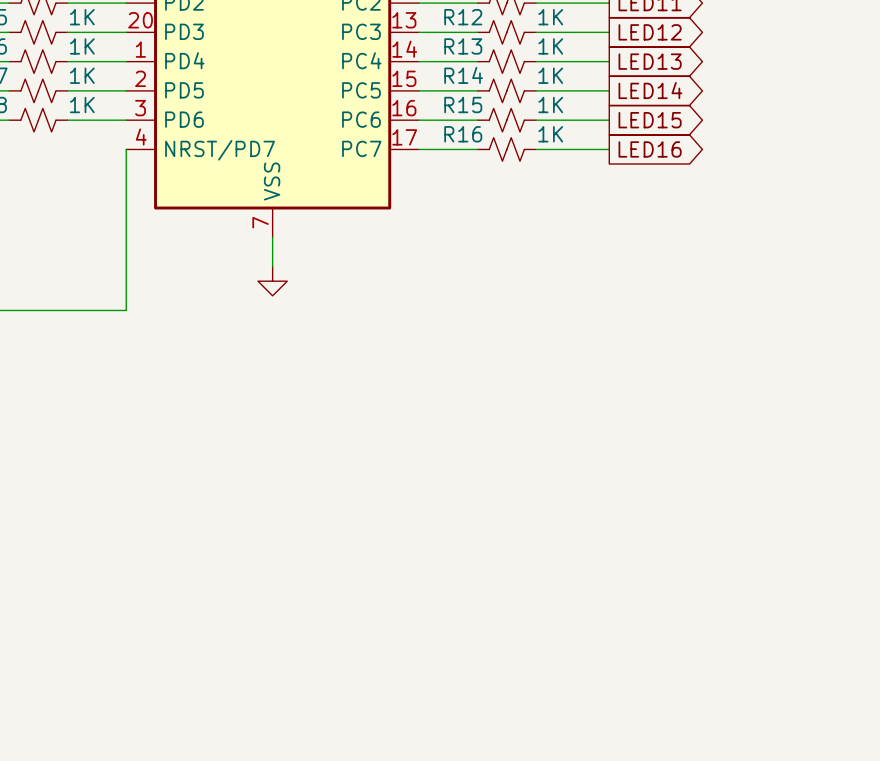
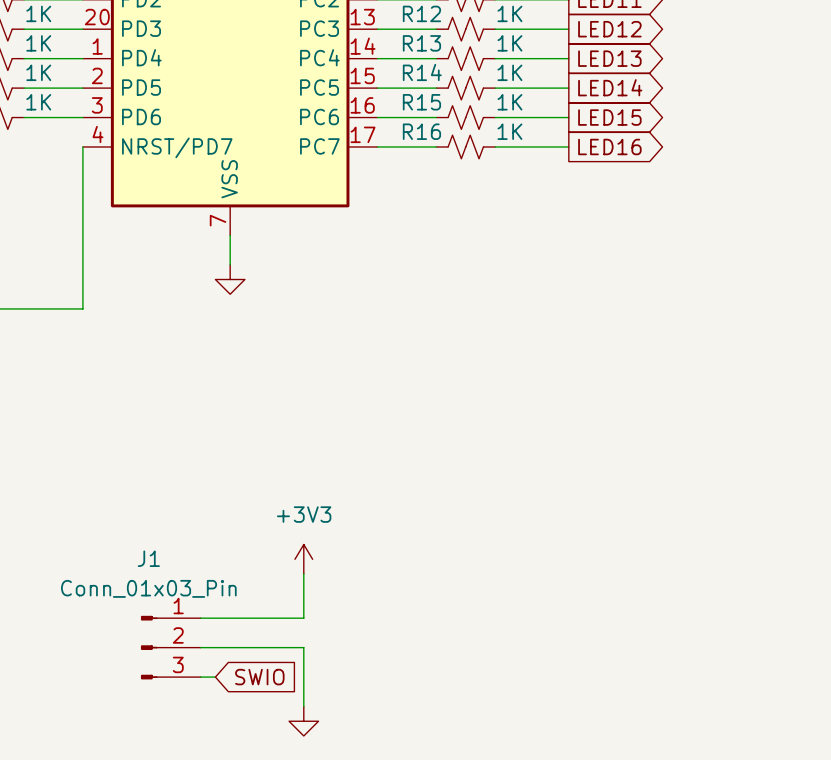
power symbol: none -> +3V3 (303, 559)
wire: none -> (303, 574) (303, 618) (200, 618)
J1: none -> Conn_01x03_Pin (170, 647)
wire: none -> (200, 647) (303, 647) (303, 706)
wire: none -> (200, 677) (215, 677)
global label: none -> SWIO (259, 677)
power symbol: none -> (303, 721)

